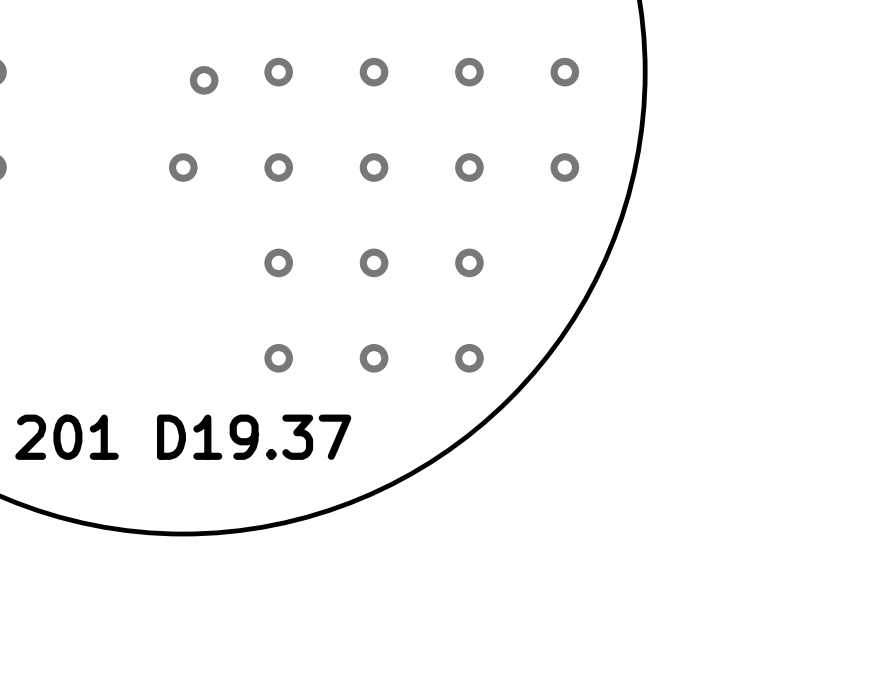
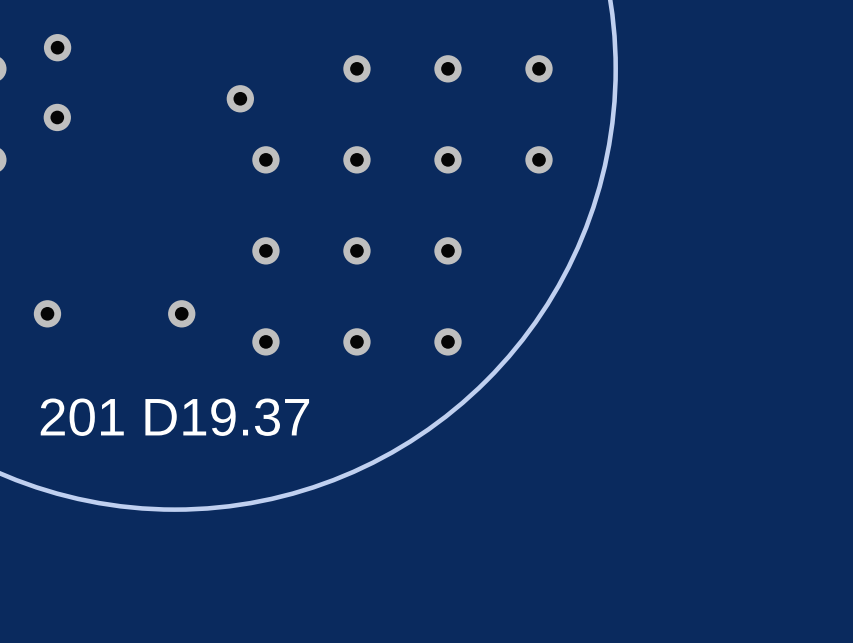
via: none -> (57, 47)
via: (278, 72) -> none
via: (204, 80) -> none
via: none -> (240, 98)
via: none -> (57, 117)
via: (183, 167) -> none
via: none -> (47, 313)
via: none -> (181, 313)

